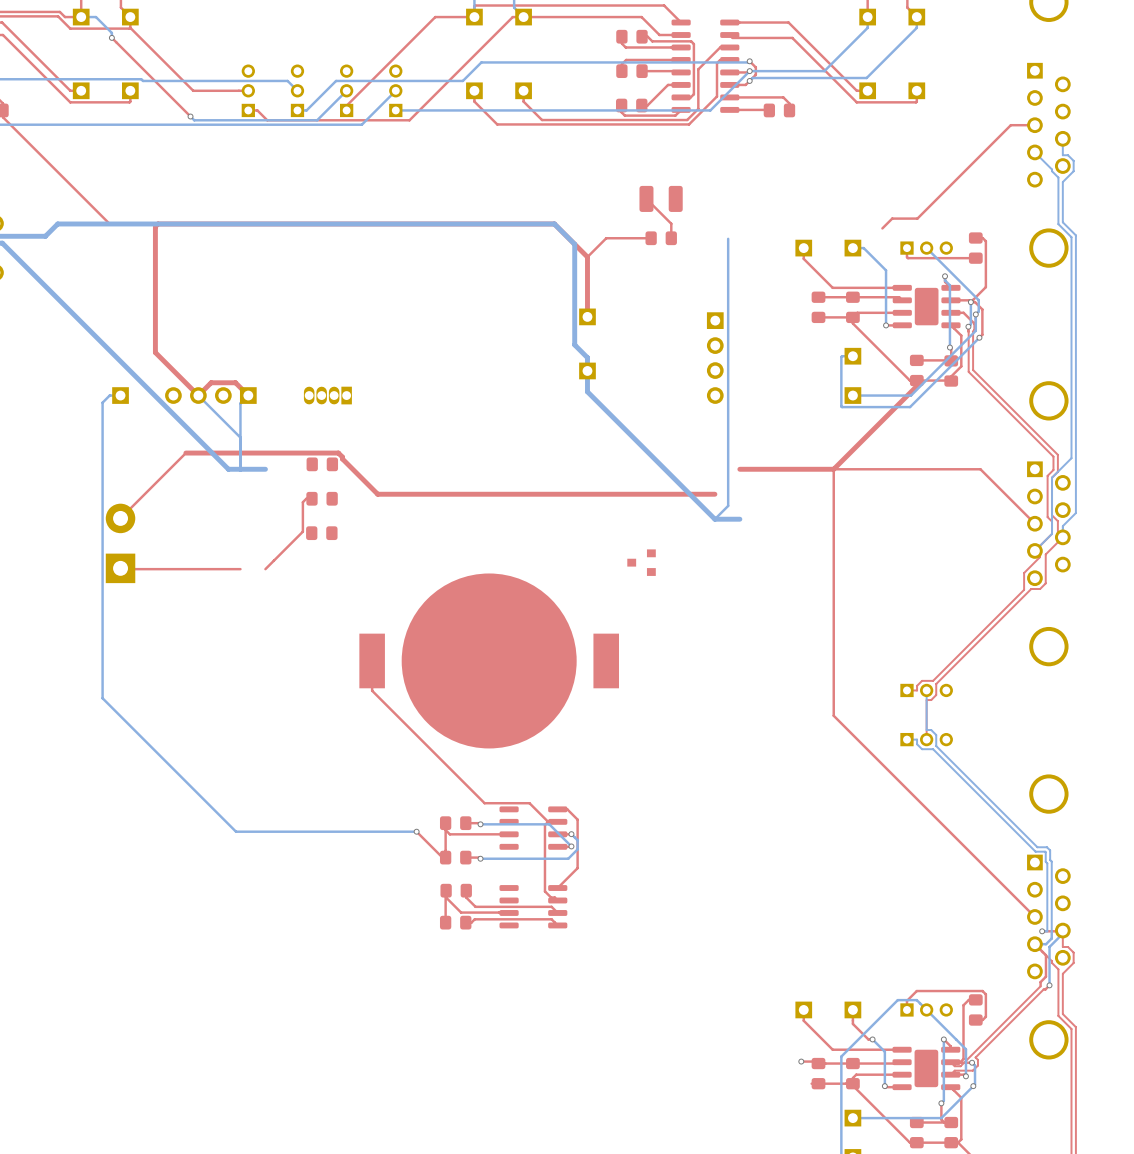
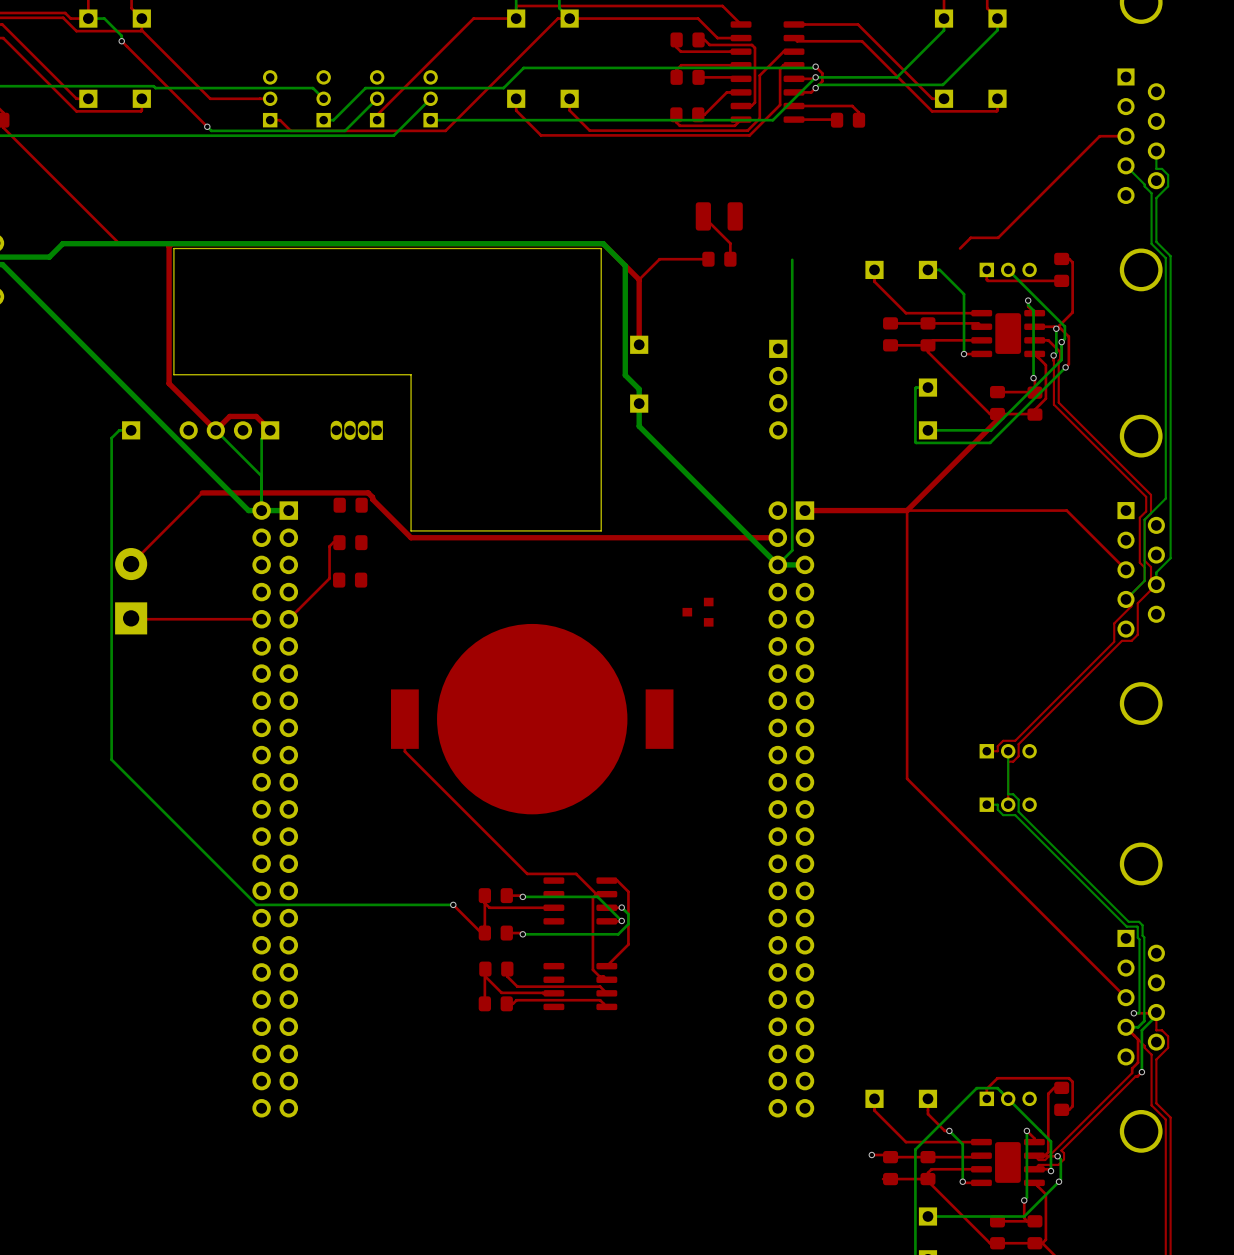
board edge: none -> (601, 248) (173, 248) (173, 374) (411, 374) (411, 530) (601, 530) (601, 248)
part: none -> (275, 809)
part: none -> (791, 809)

